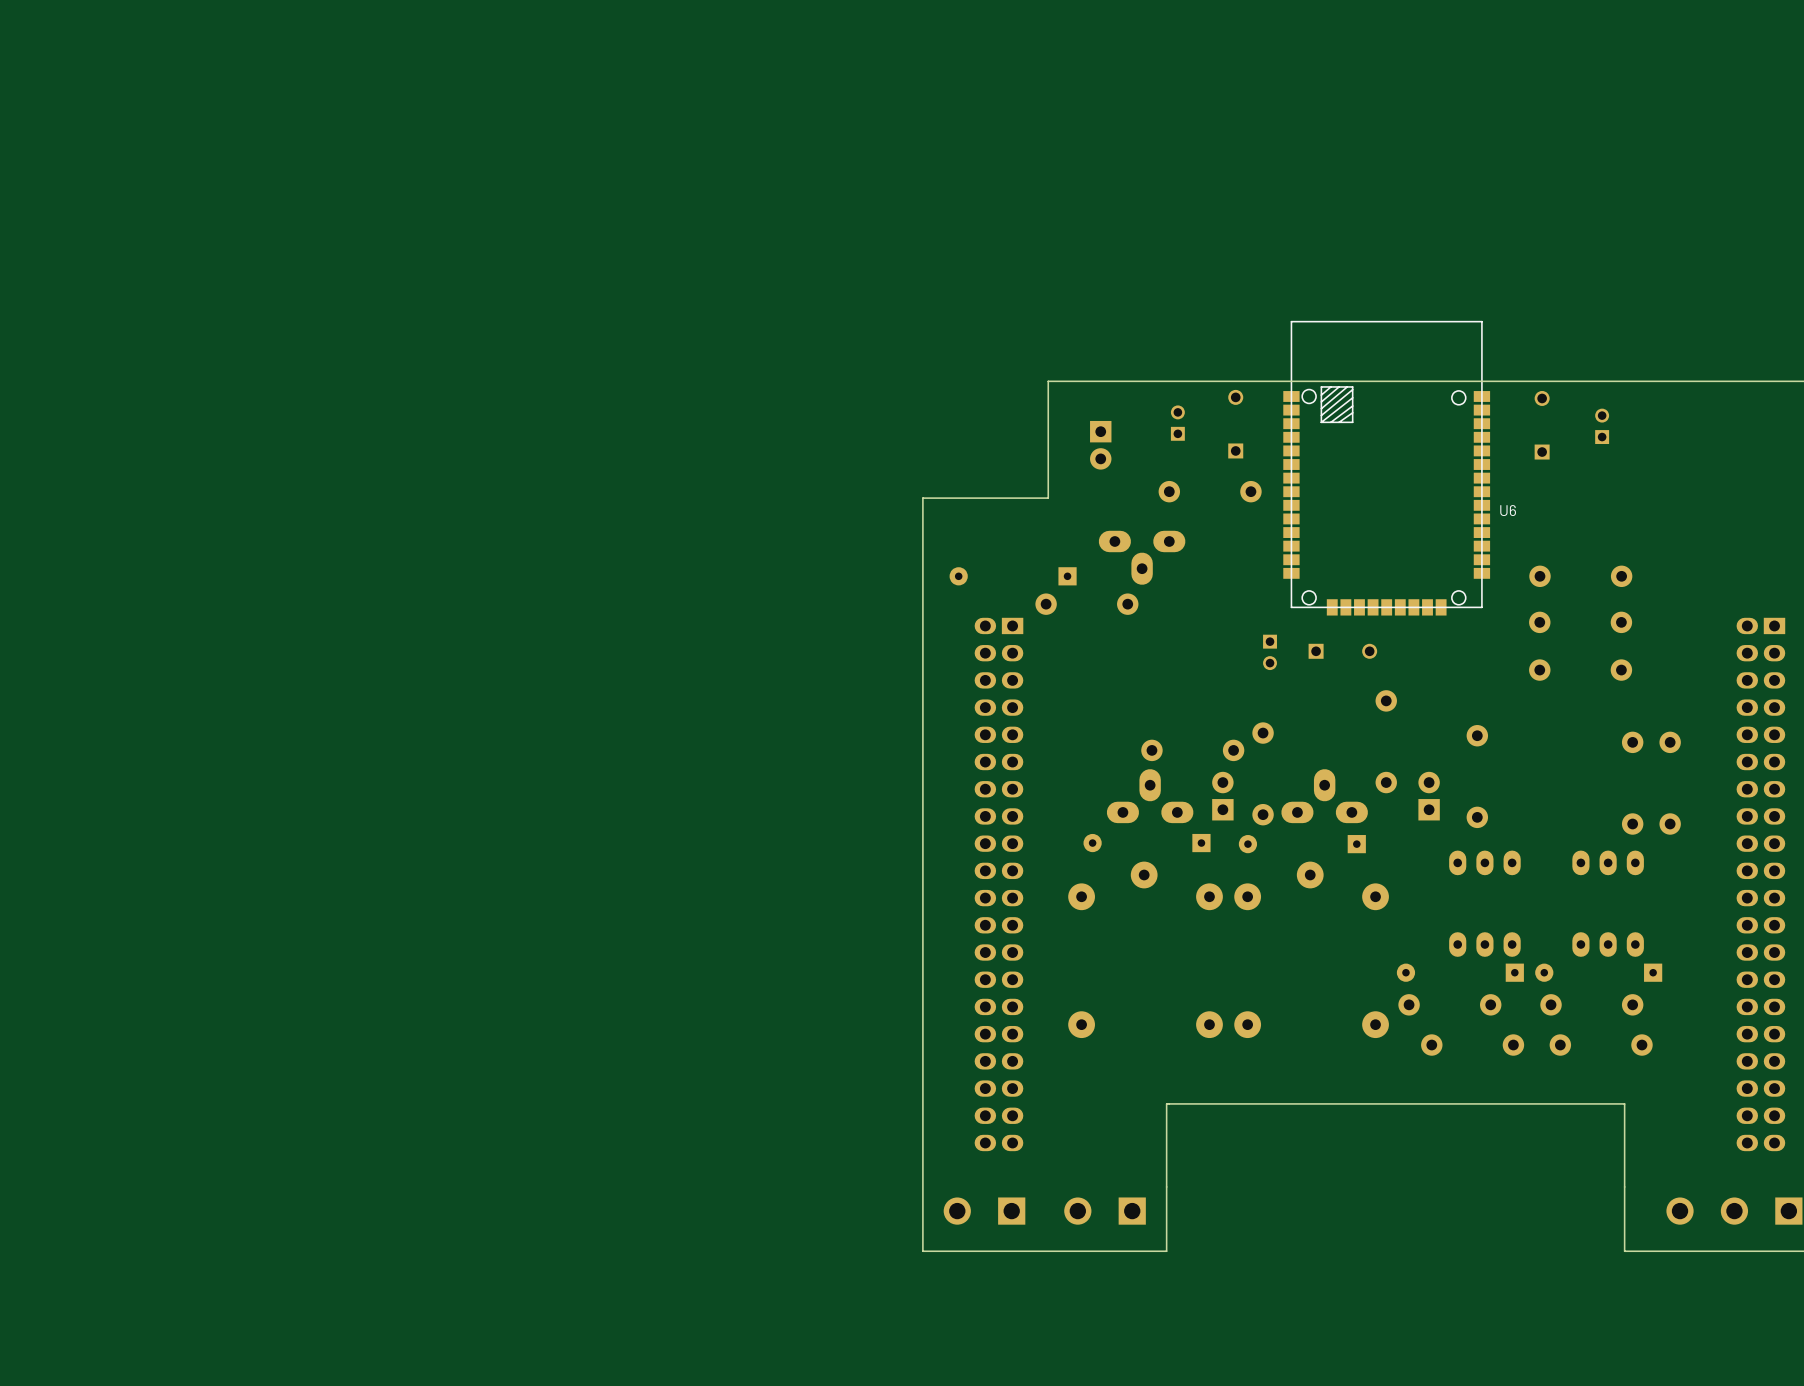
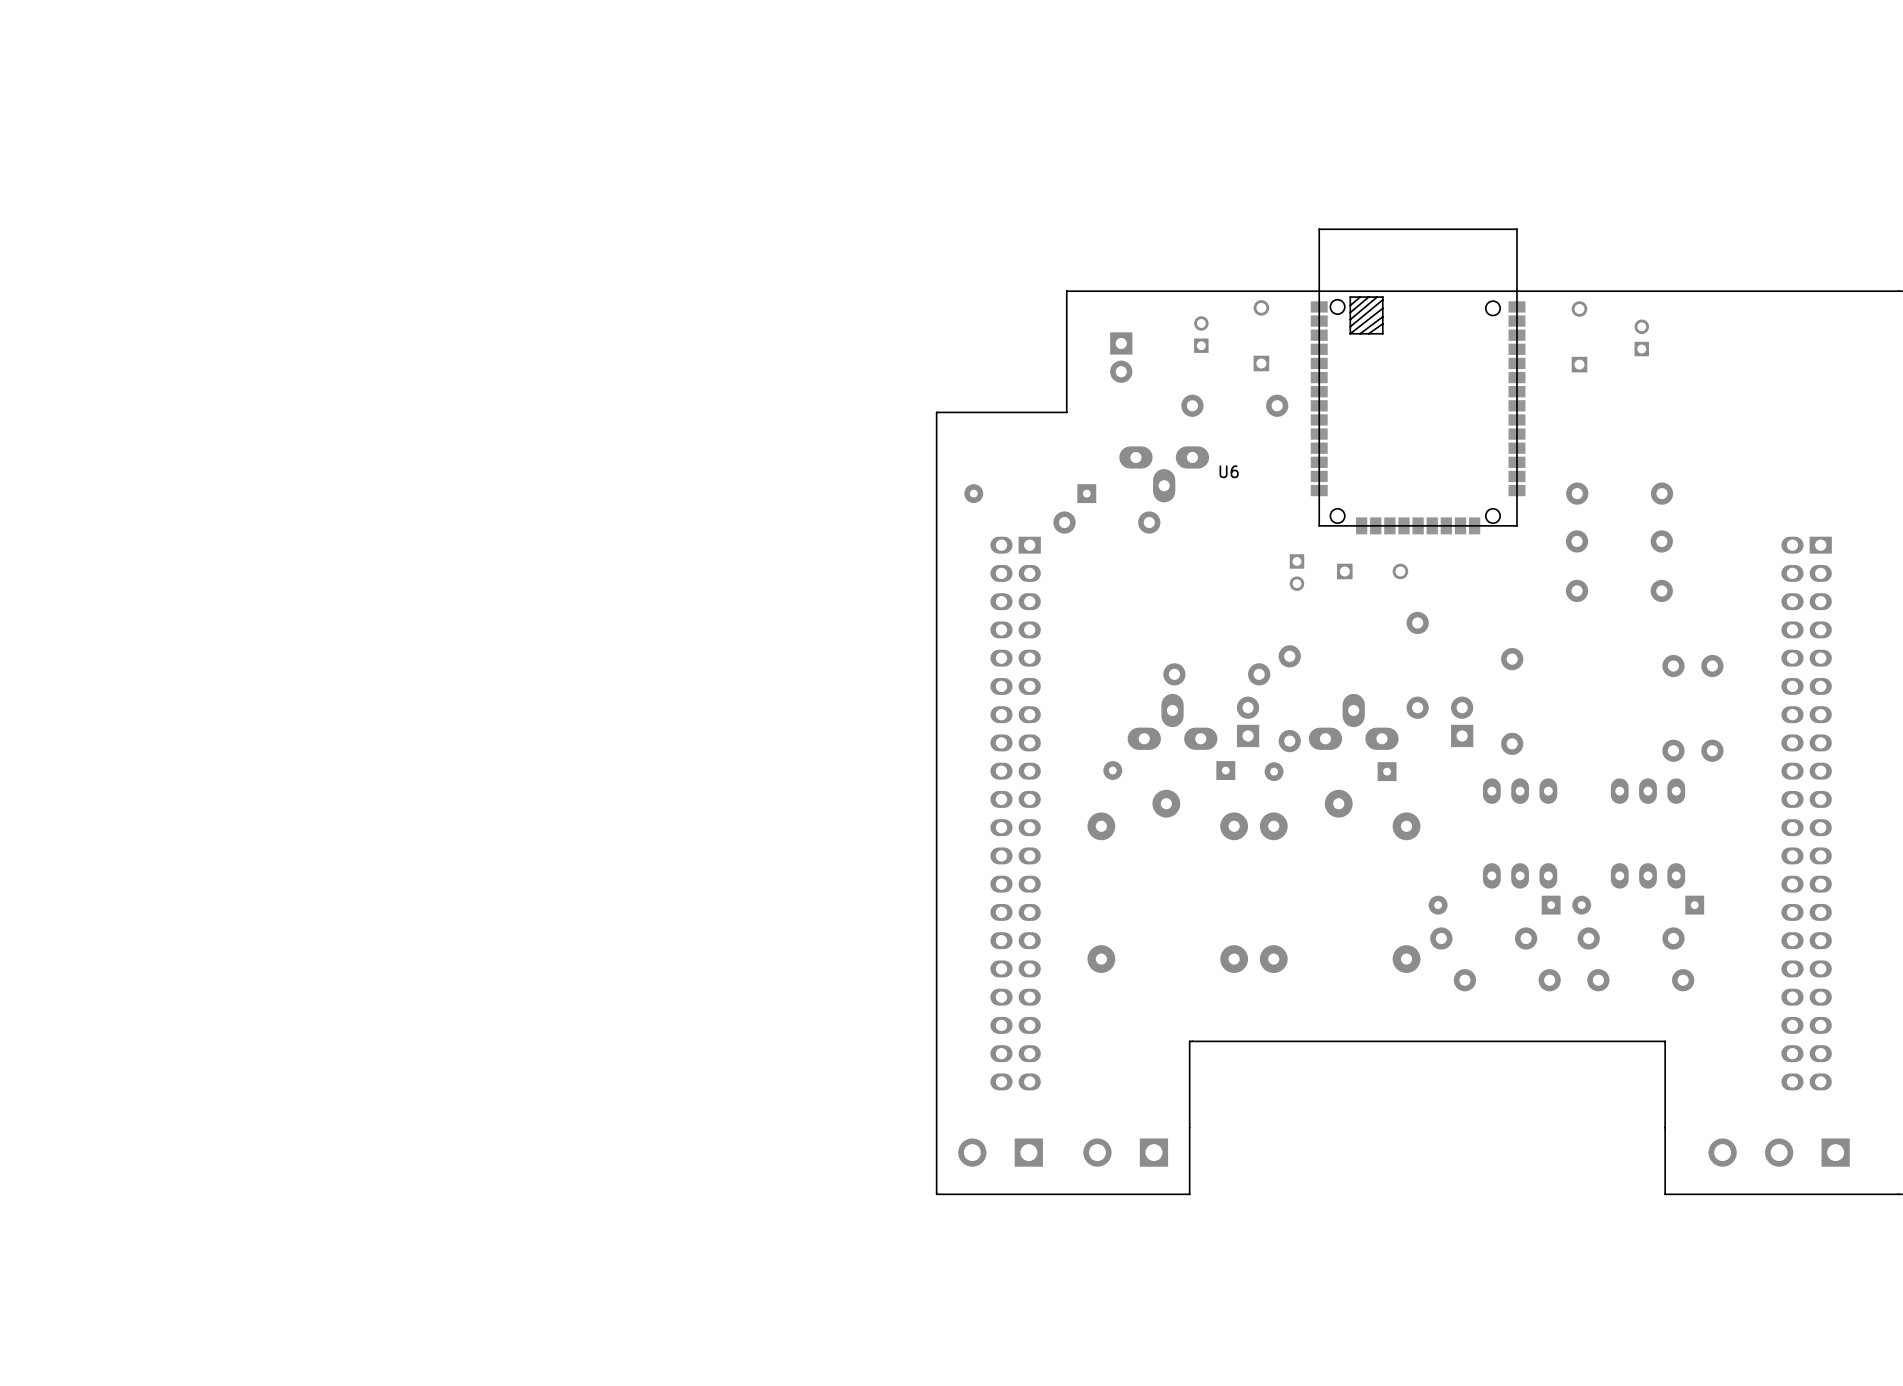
U6 name position: U6 (1508, 510) -> U6 (1229, 471)

